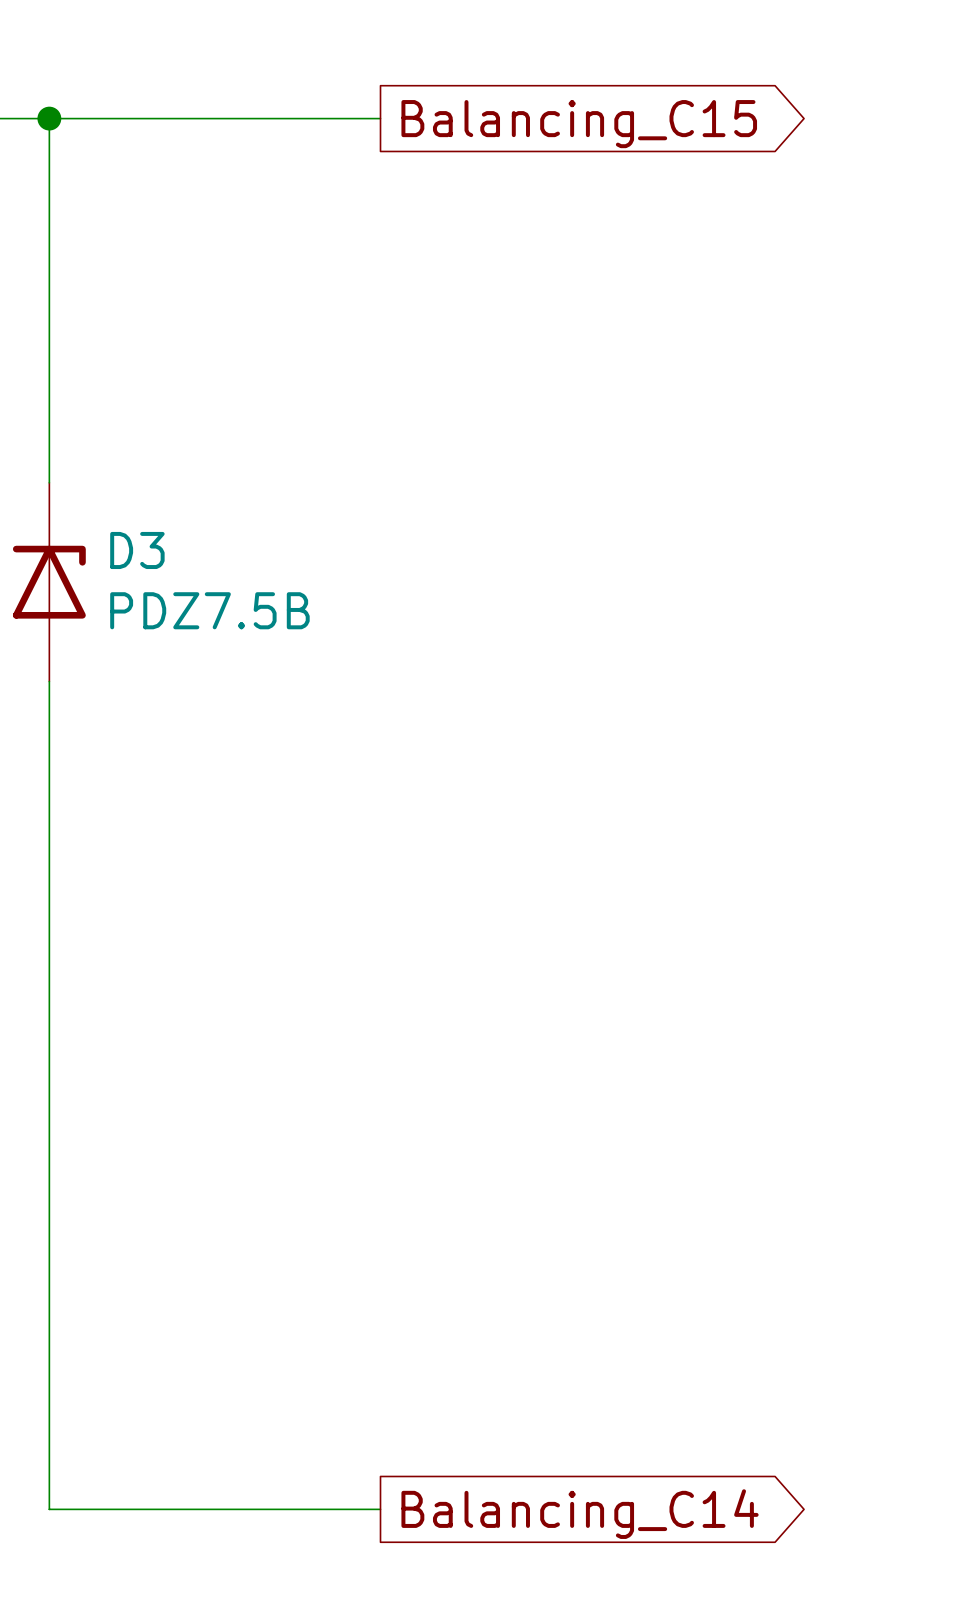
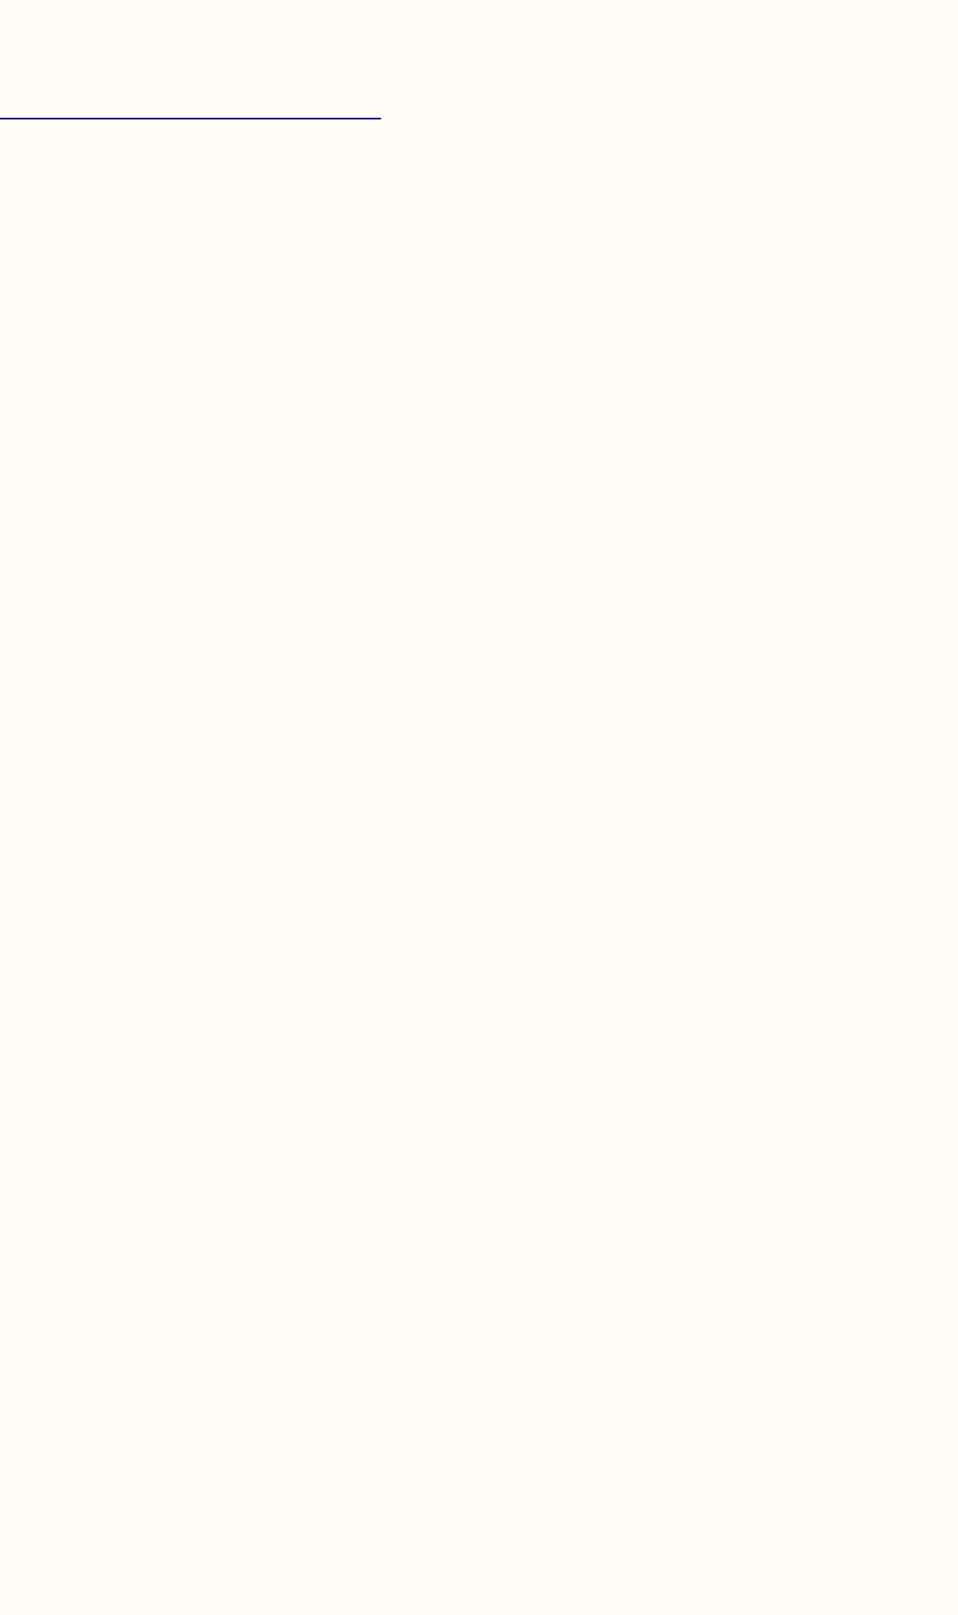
wire: (49, 118) (49, 482) -> none
junction: (49, 118) -> none
global label: Balancing_C15 (579, 124) -> none
D3: PDZ7.5B (49, 582) -> none
wire: (49, 681) (49, 1509) (380, 1509) -> none
global label: Balancing_C14 (580, 1514) -> none

